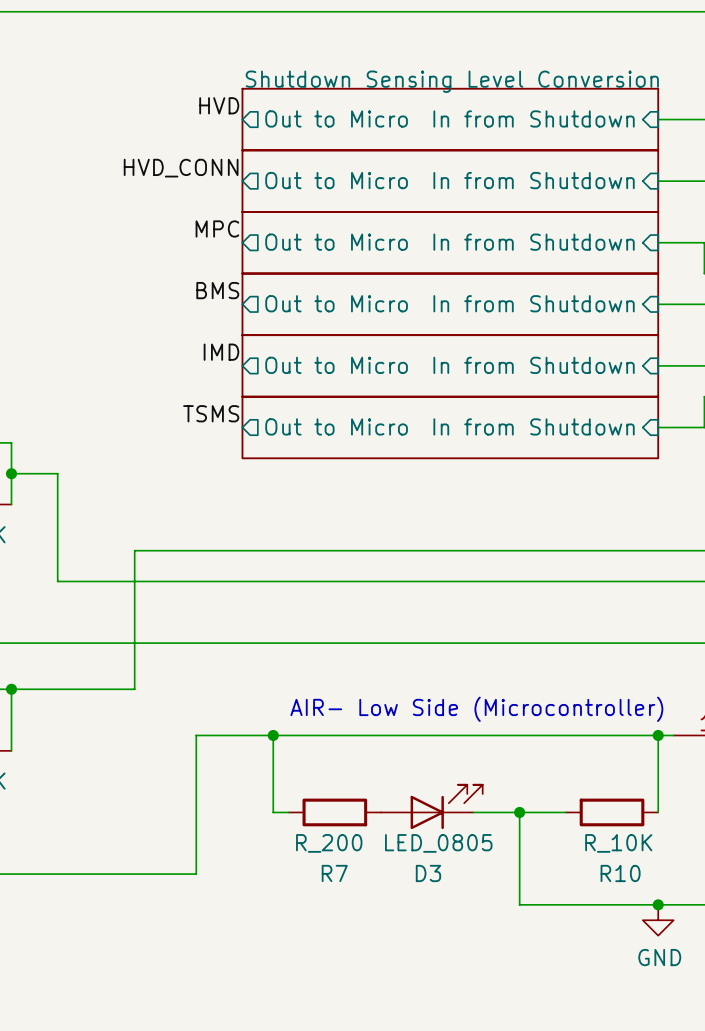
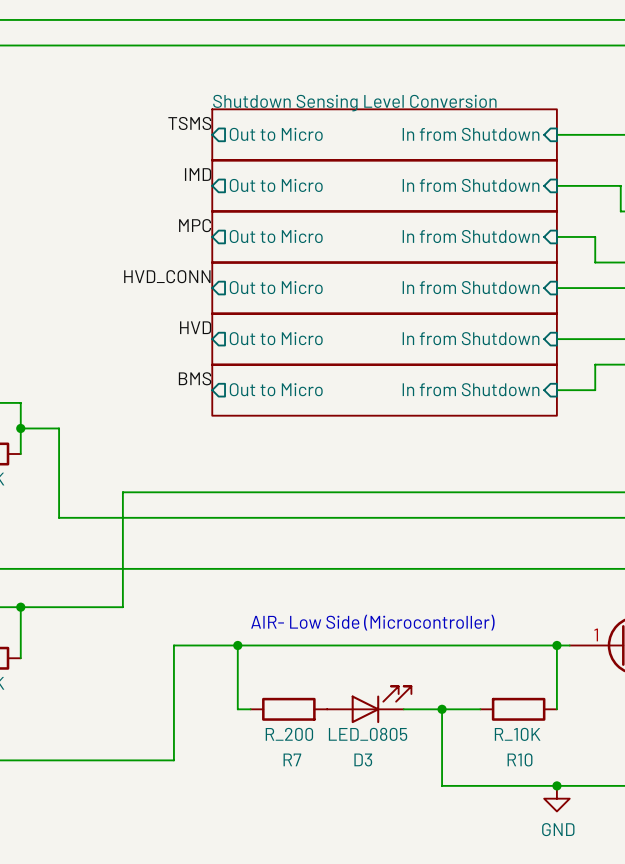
label: HVD (219, 105) -> TSMS (189, 123)
label: HVD_CONN (181, 168) -> IMD (198, 174)
label: BMS (217, 290) -> HVD_CONN (167, 276)
label: IMD (221, 352) -> HVD (195, 327)
label: TSMS (211, 413) -> BMS (195, 378)

